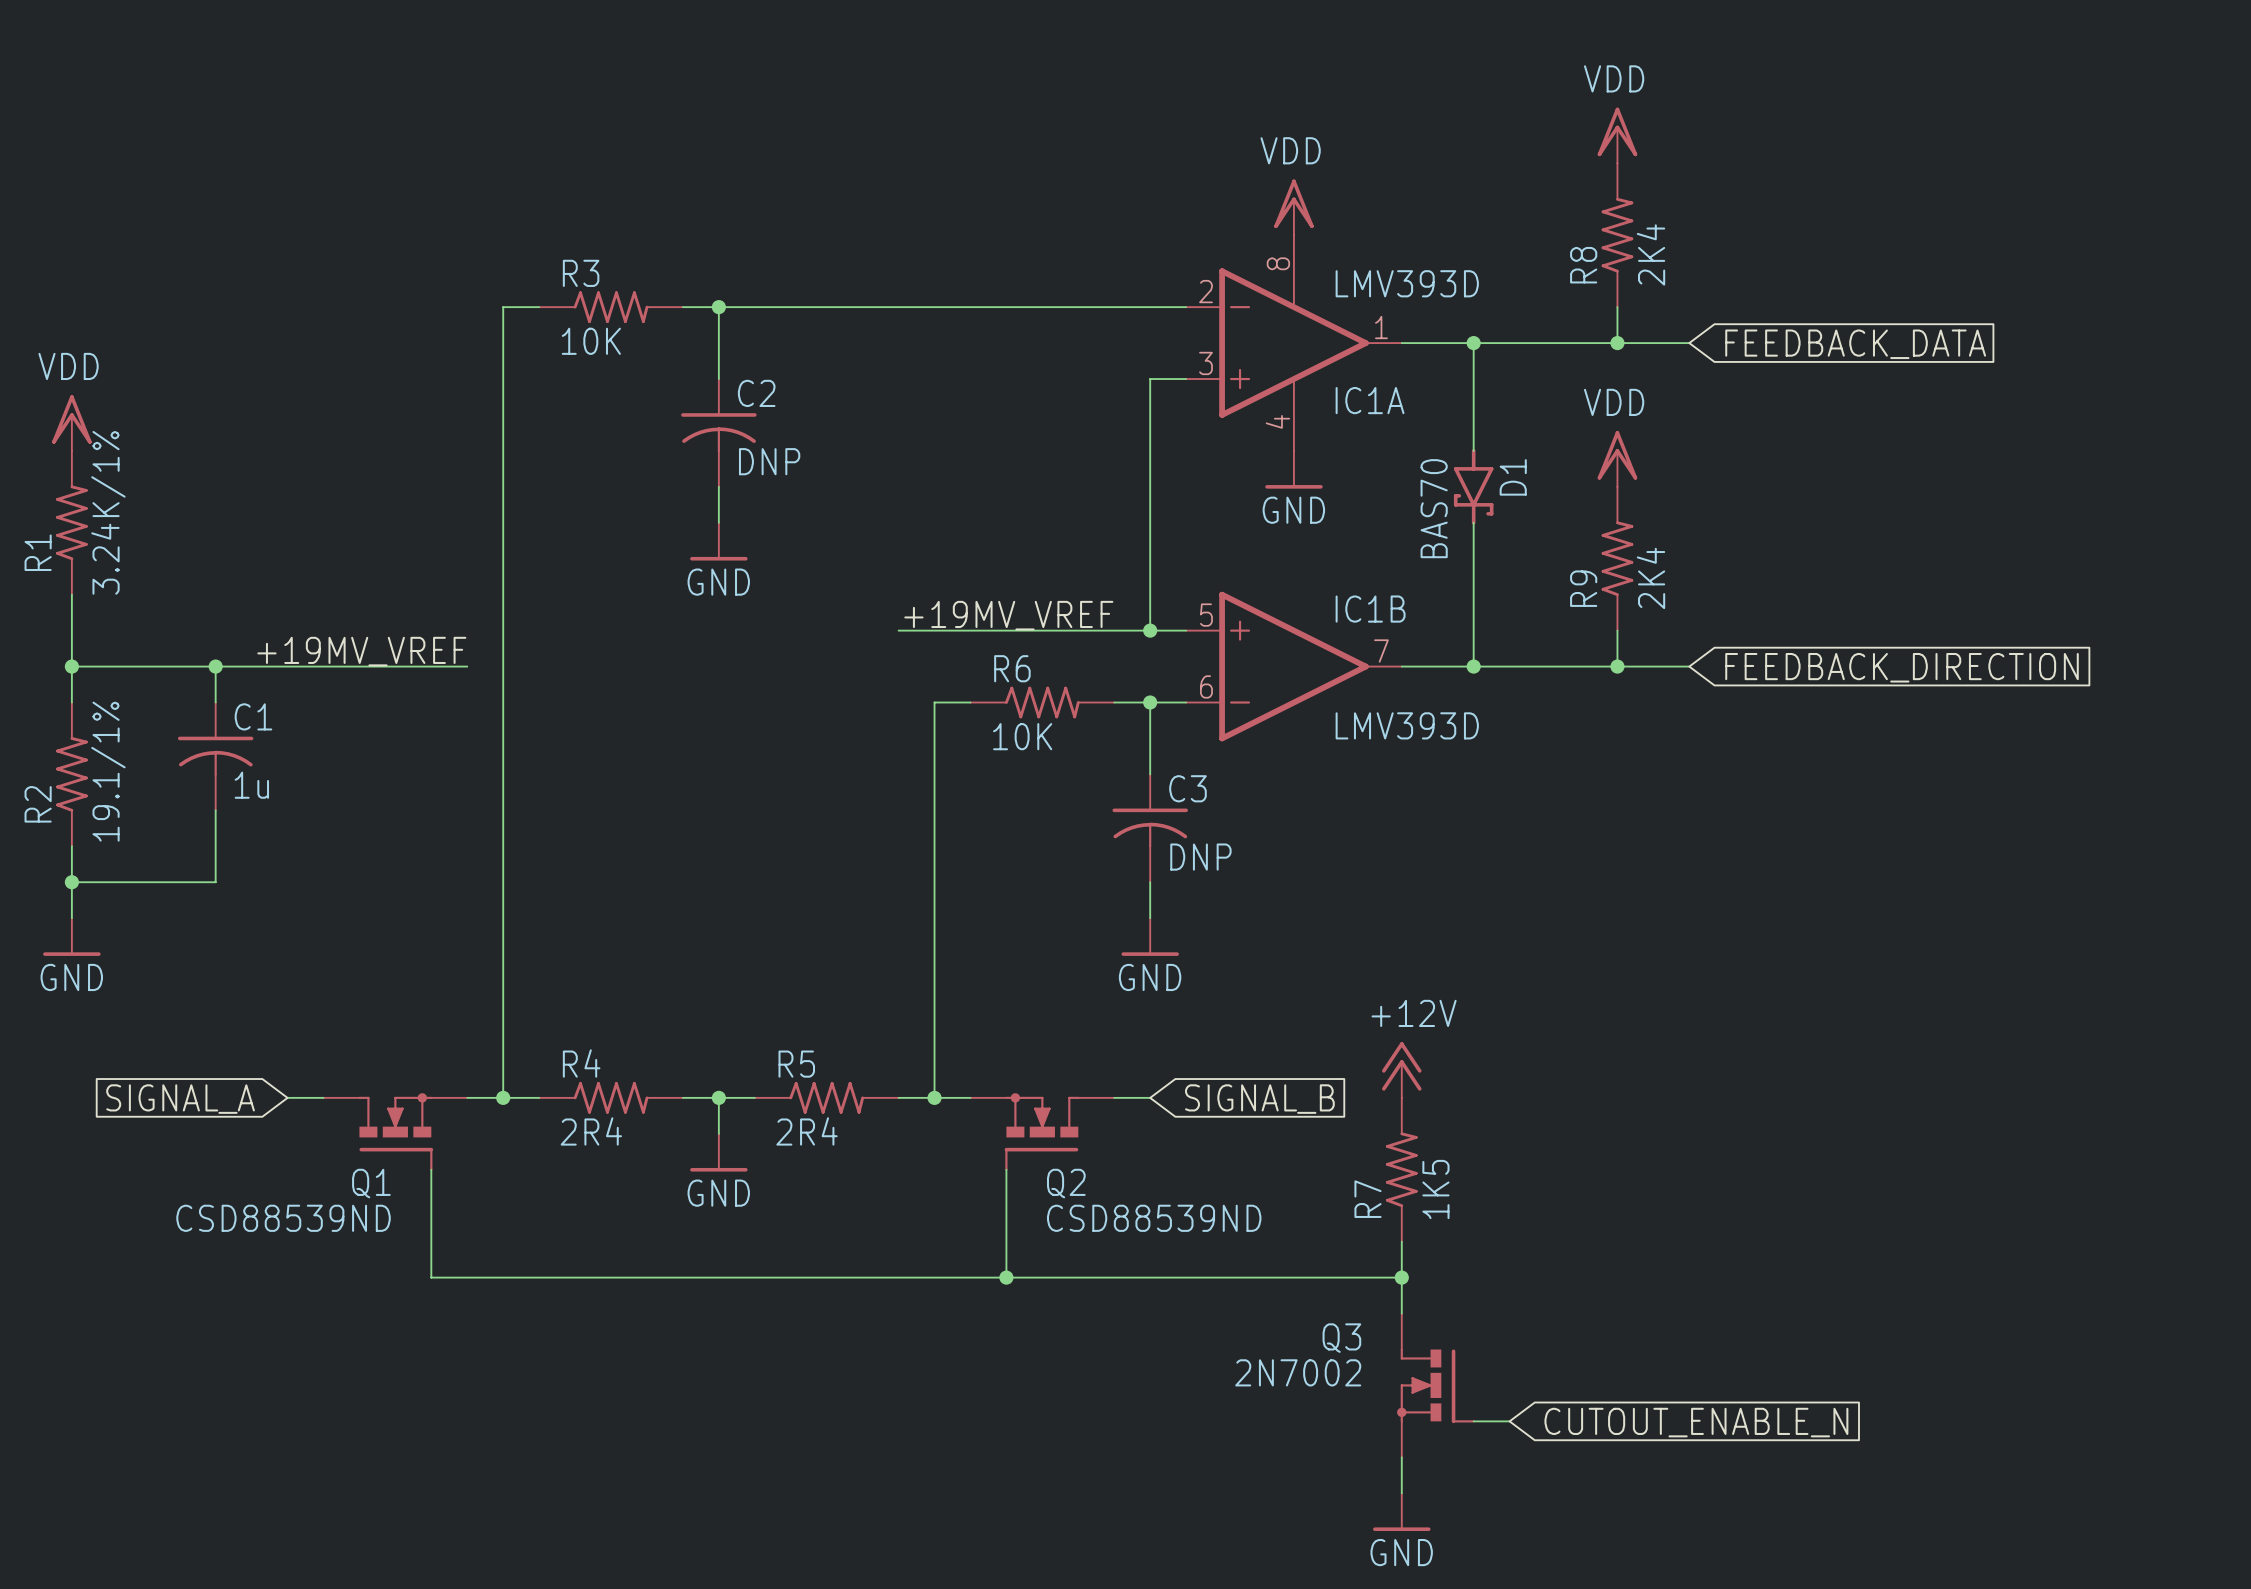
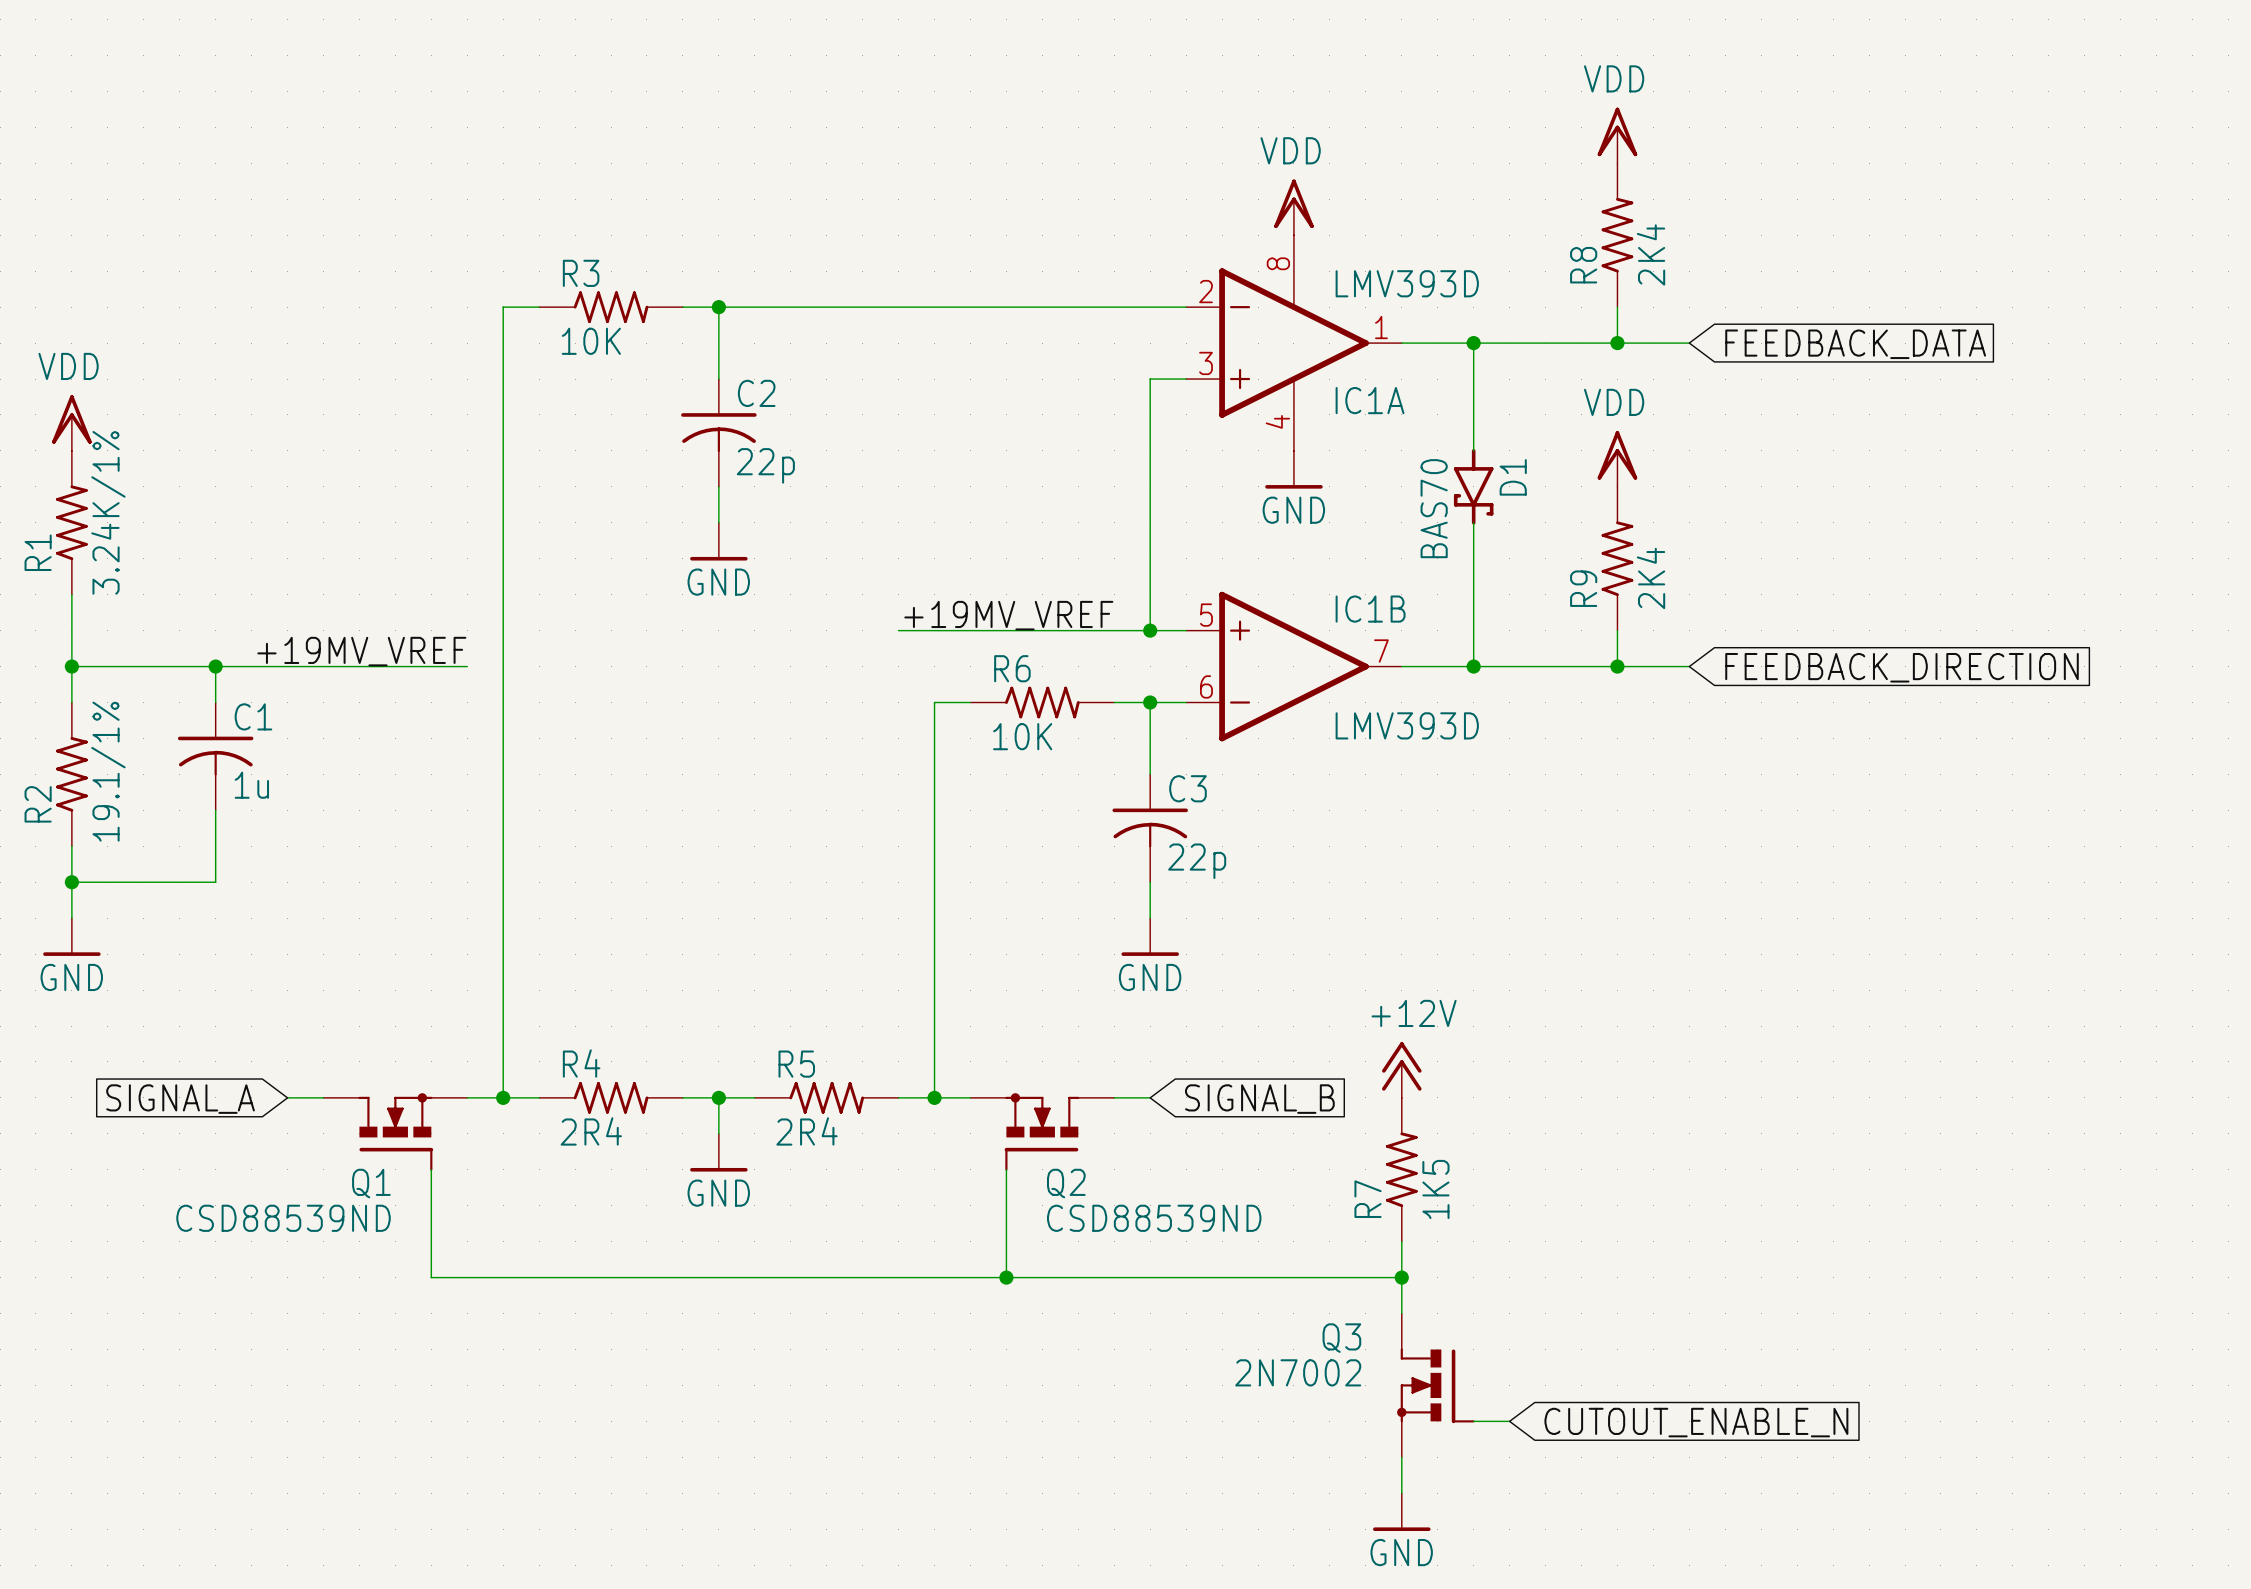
C2 value: DNP (769, 461) -> 22p (765, 465)
C3 value: DNP (1200, 857) -> 22p (1197, 861)

